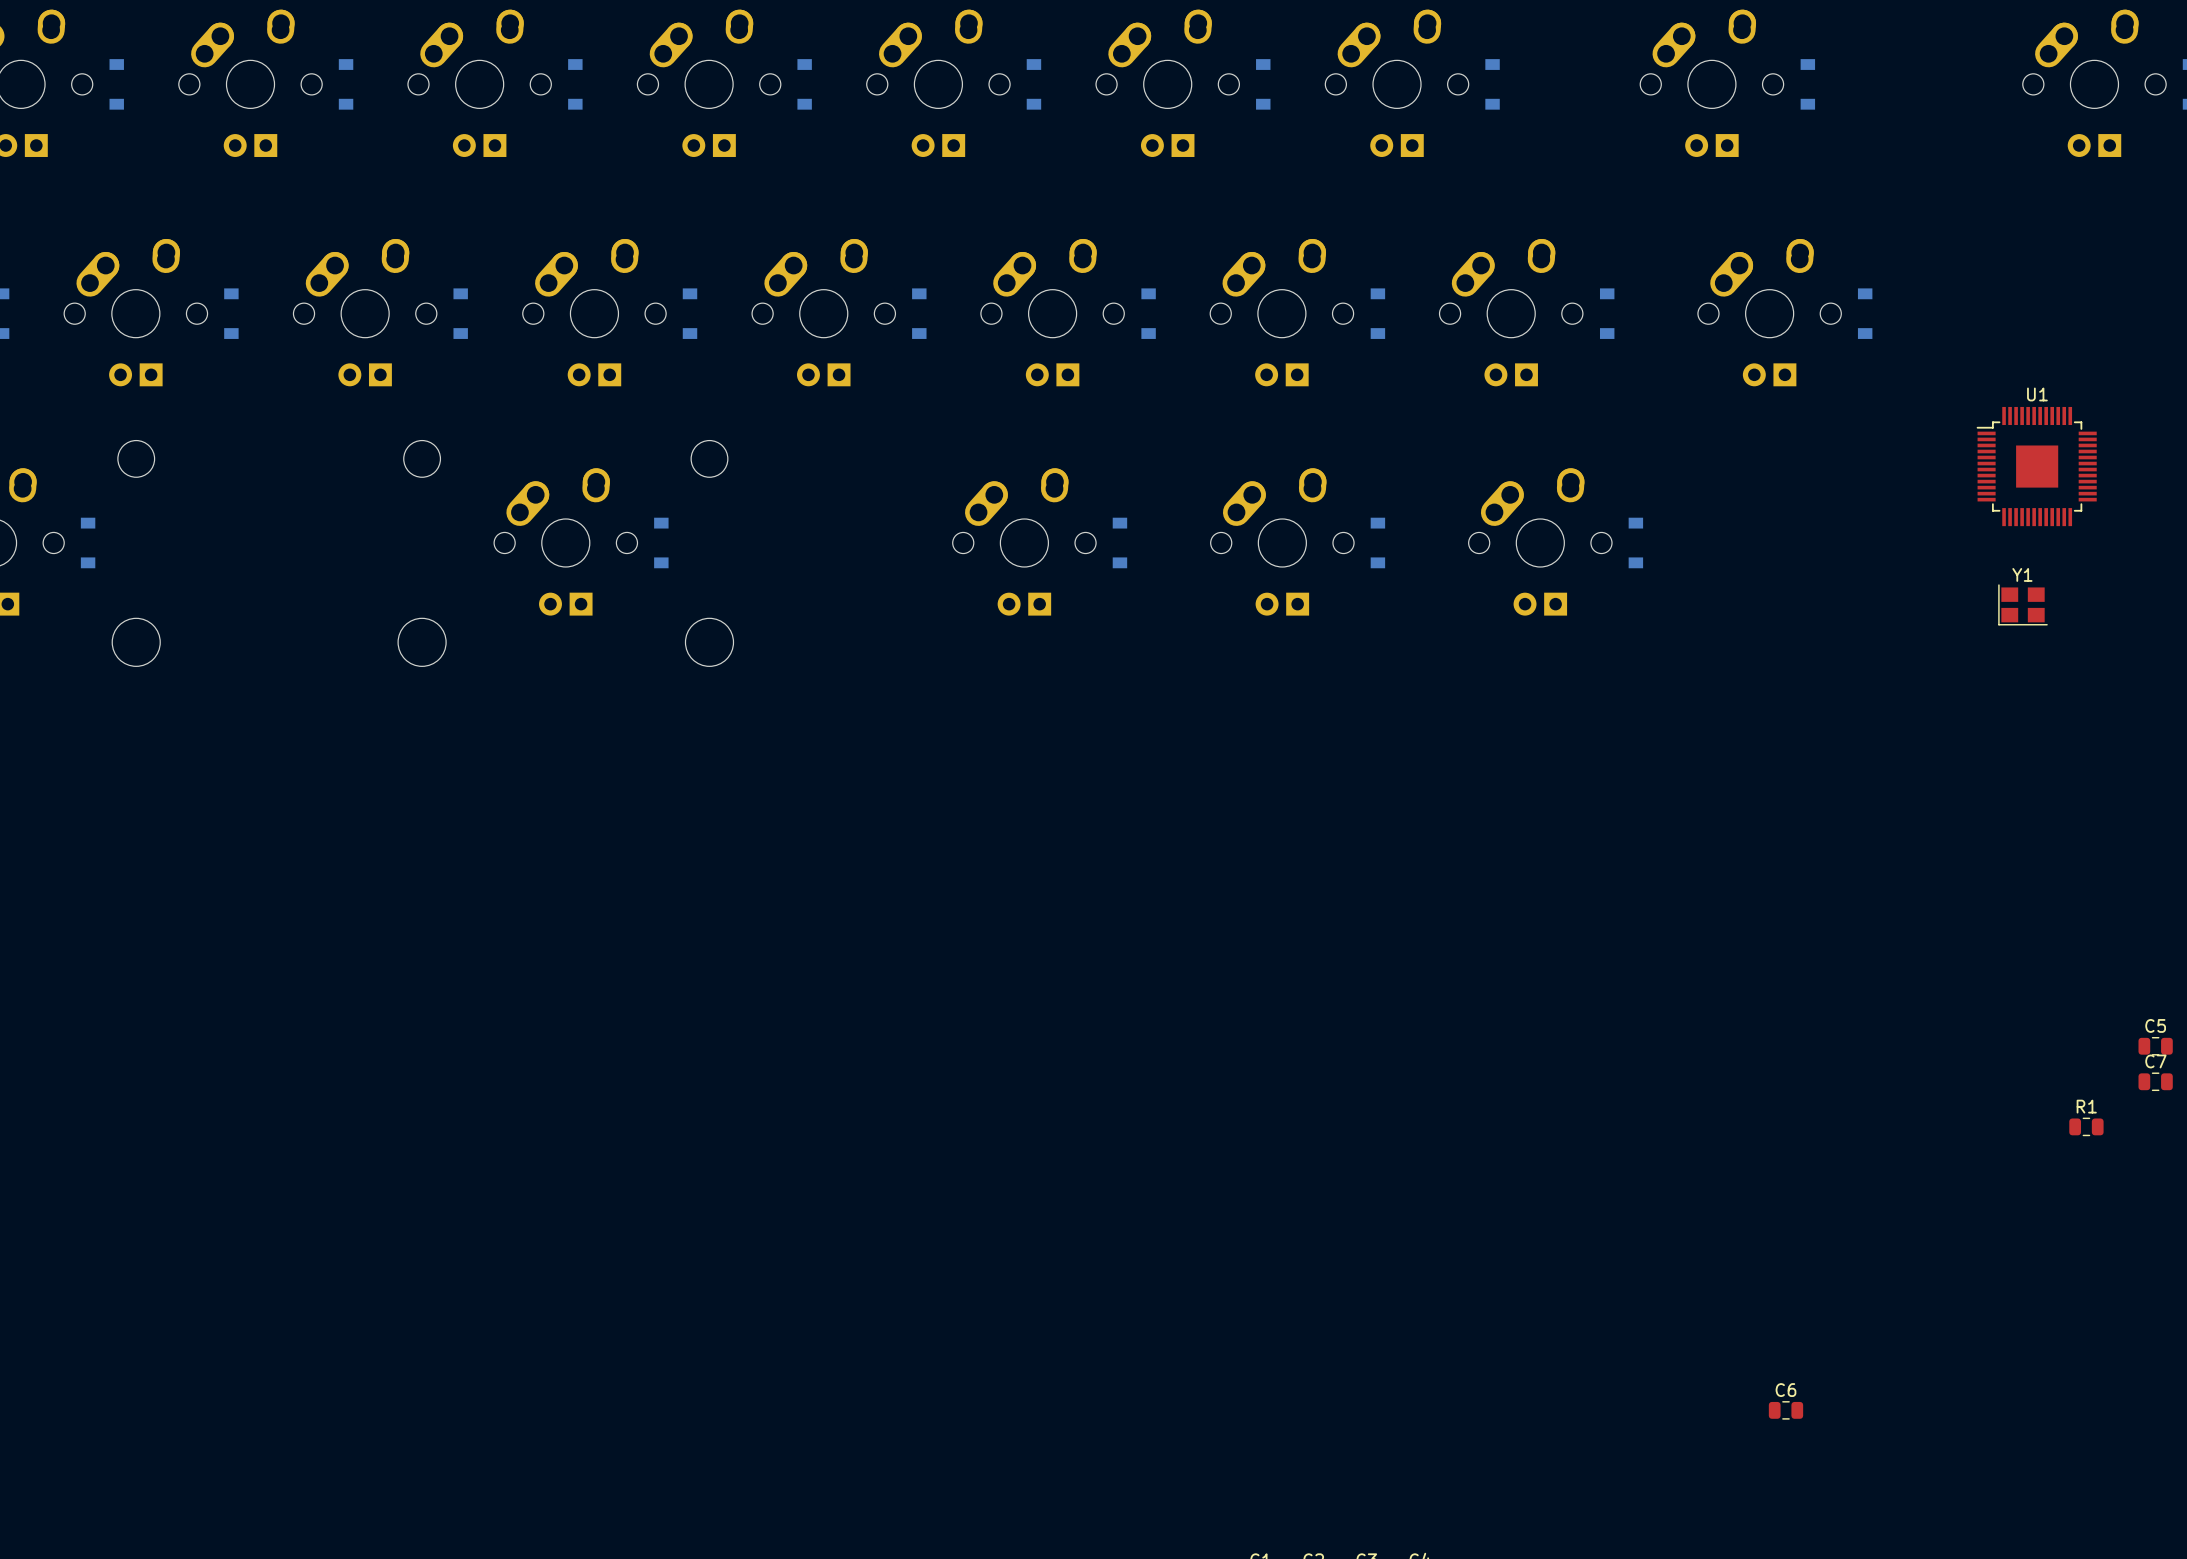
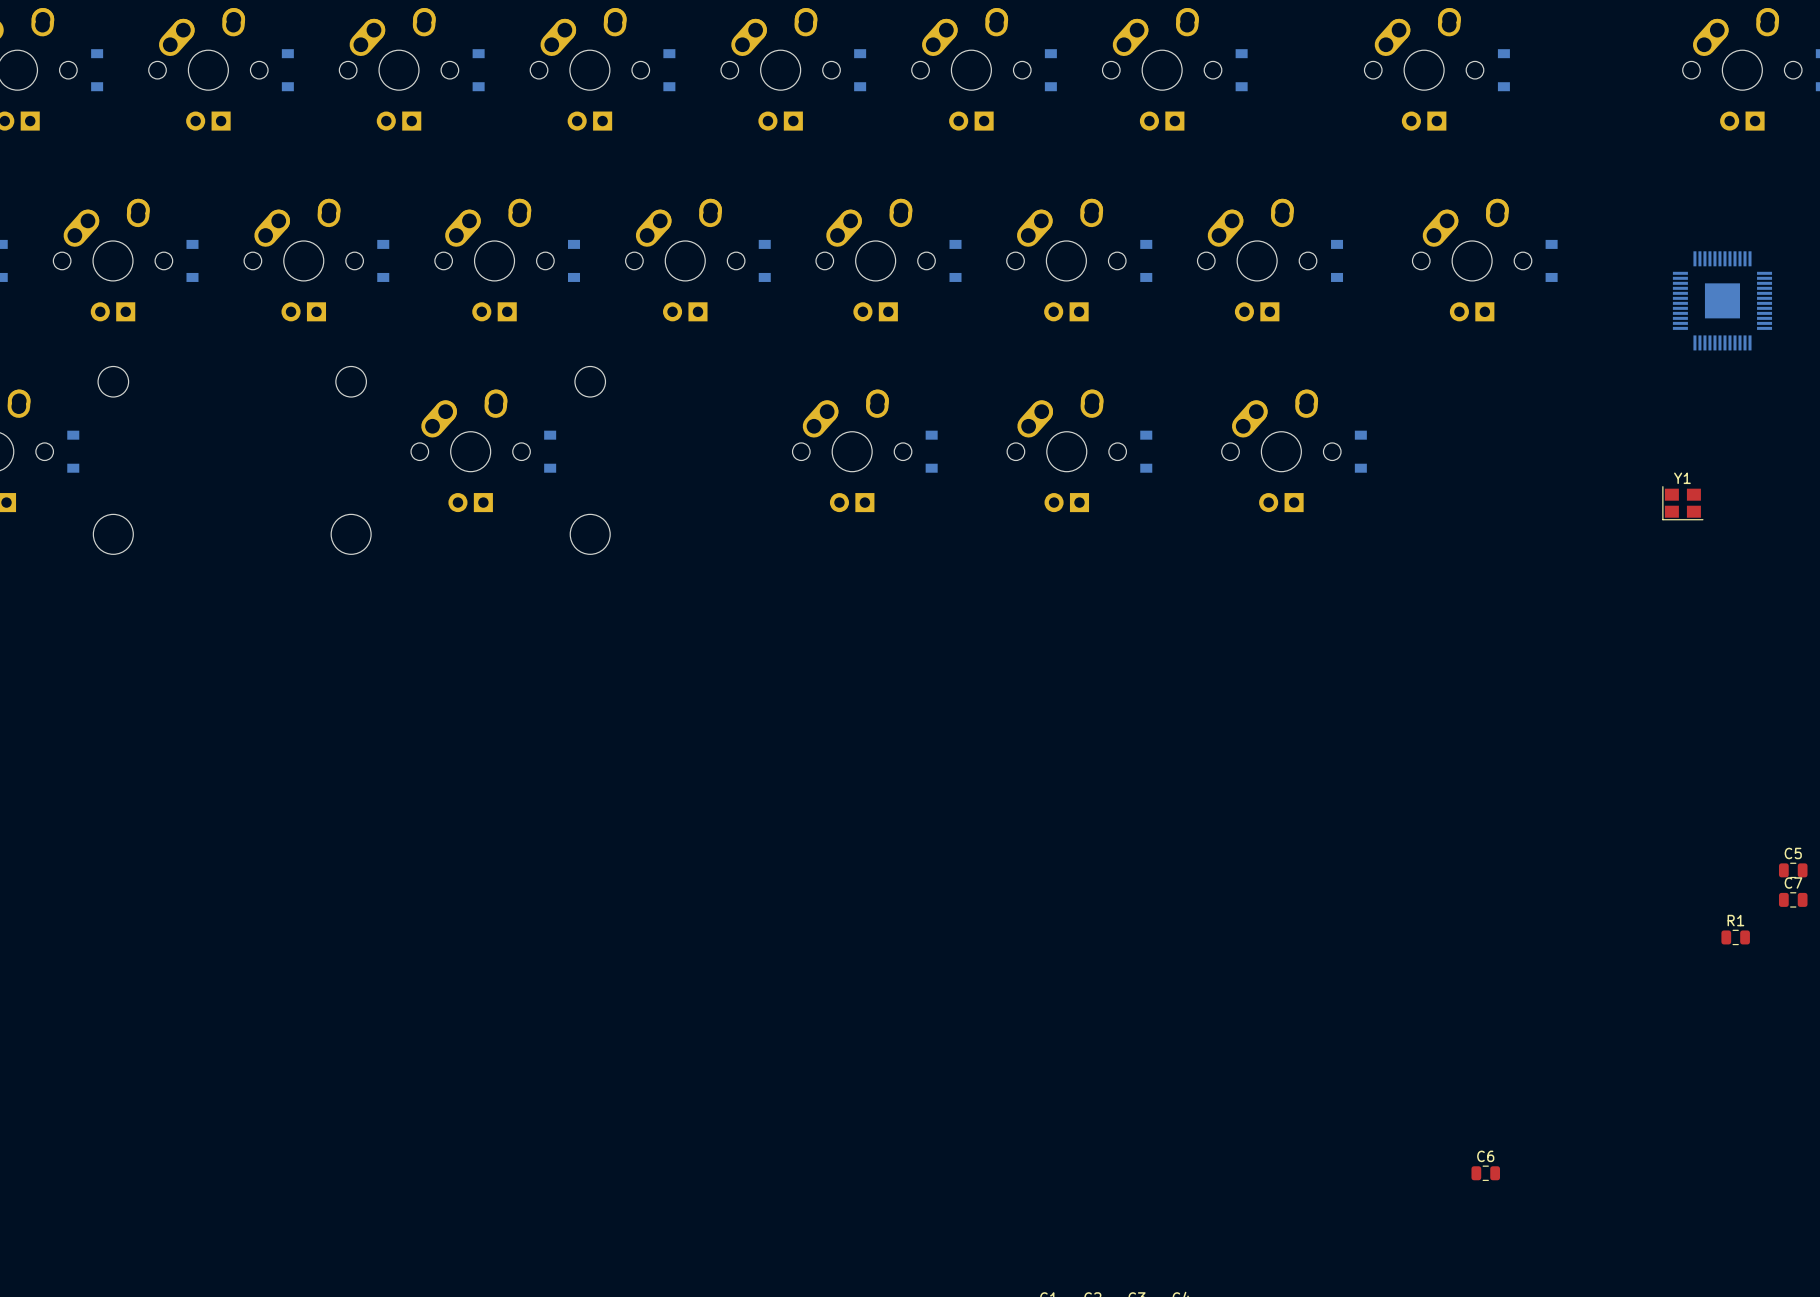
U1 side: top (2036, 466) -> bottom (1722, 300)

